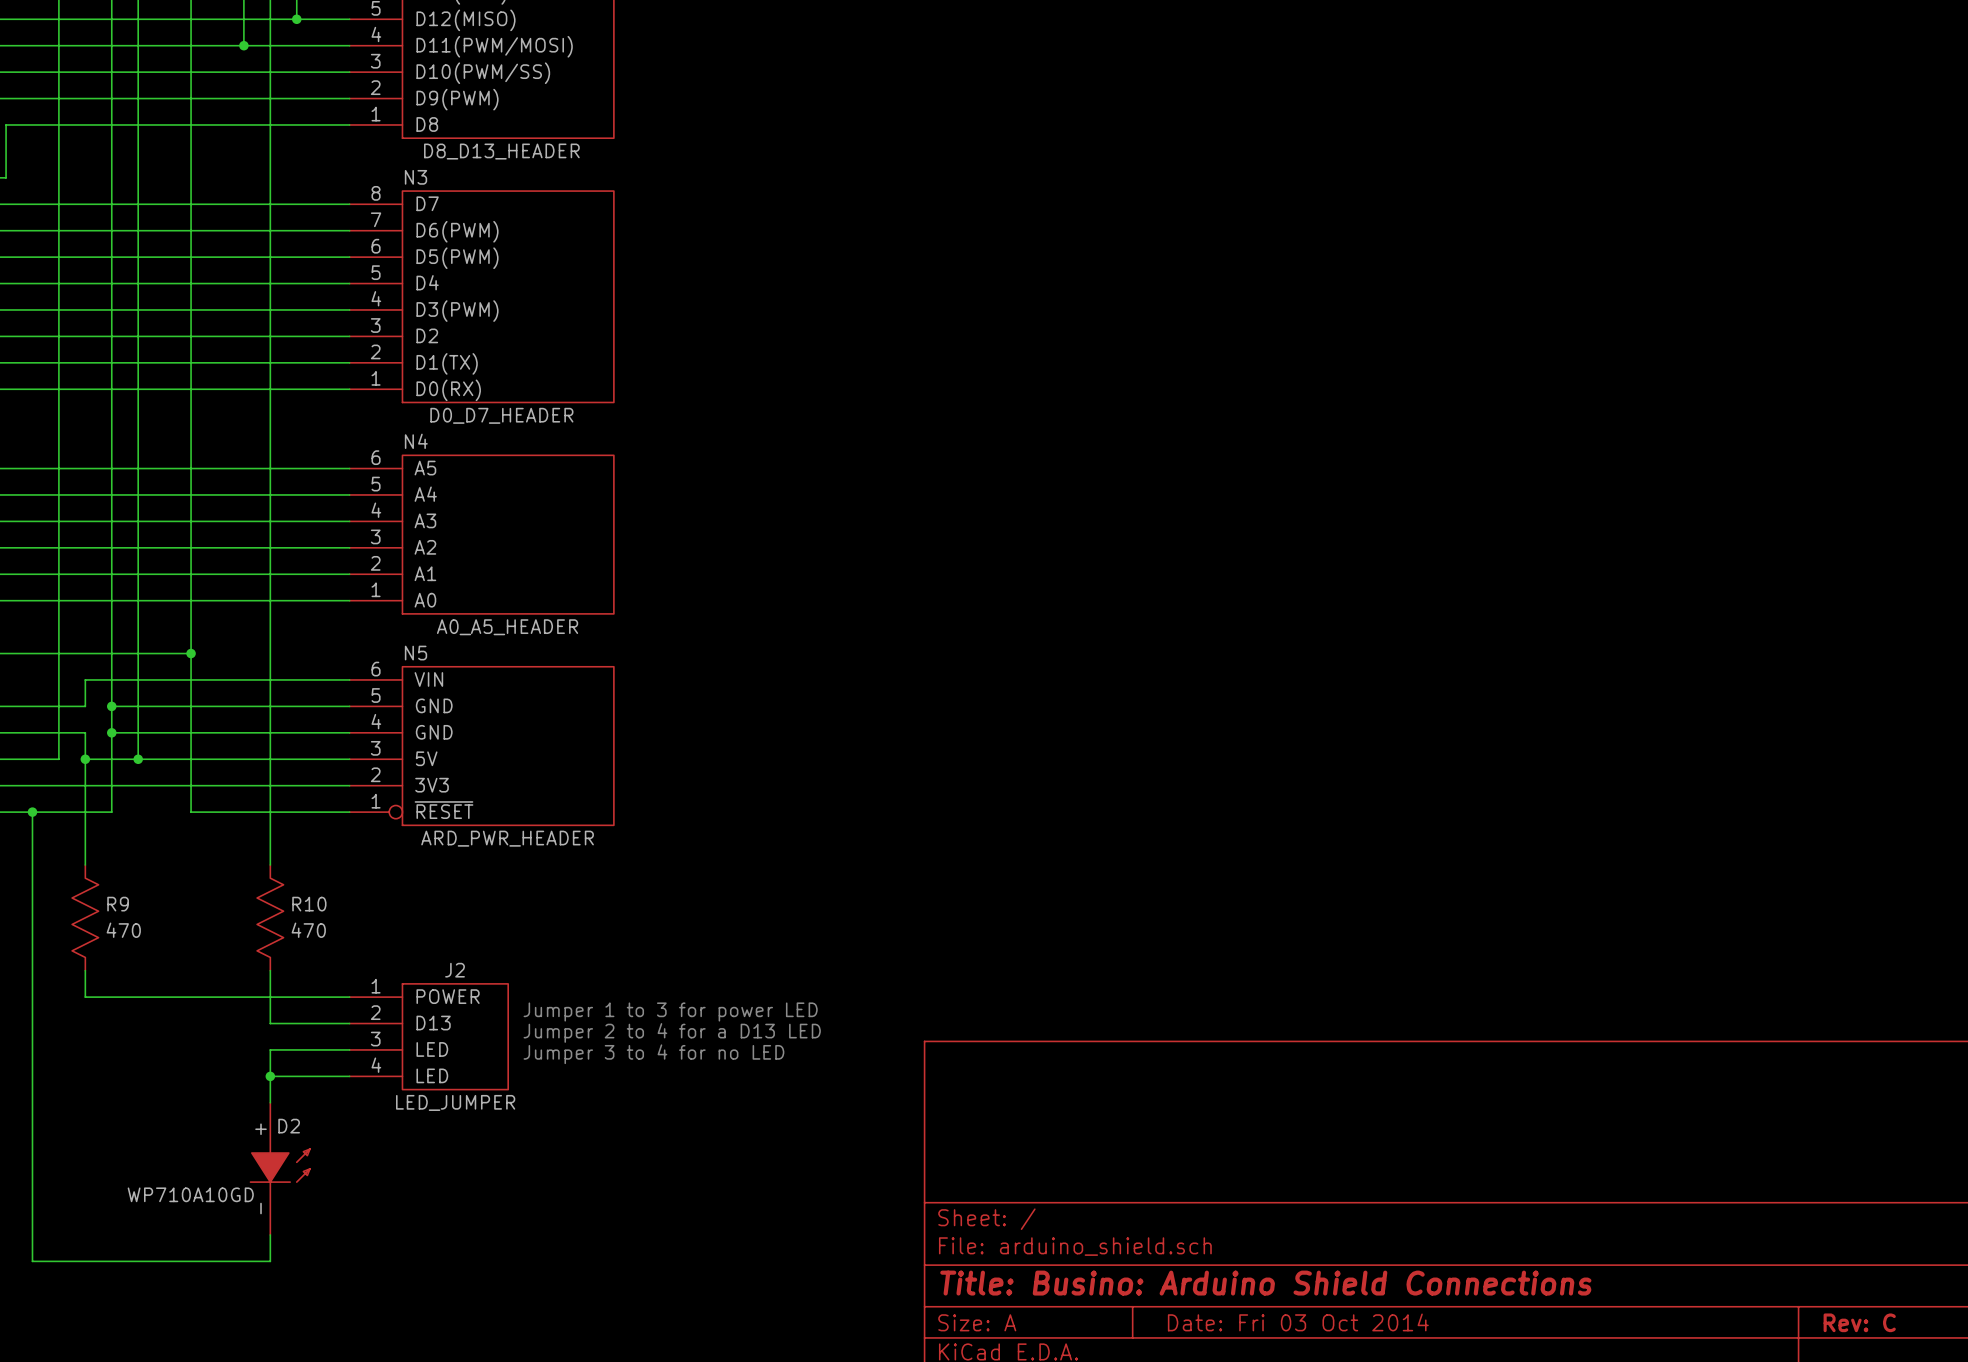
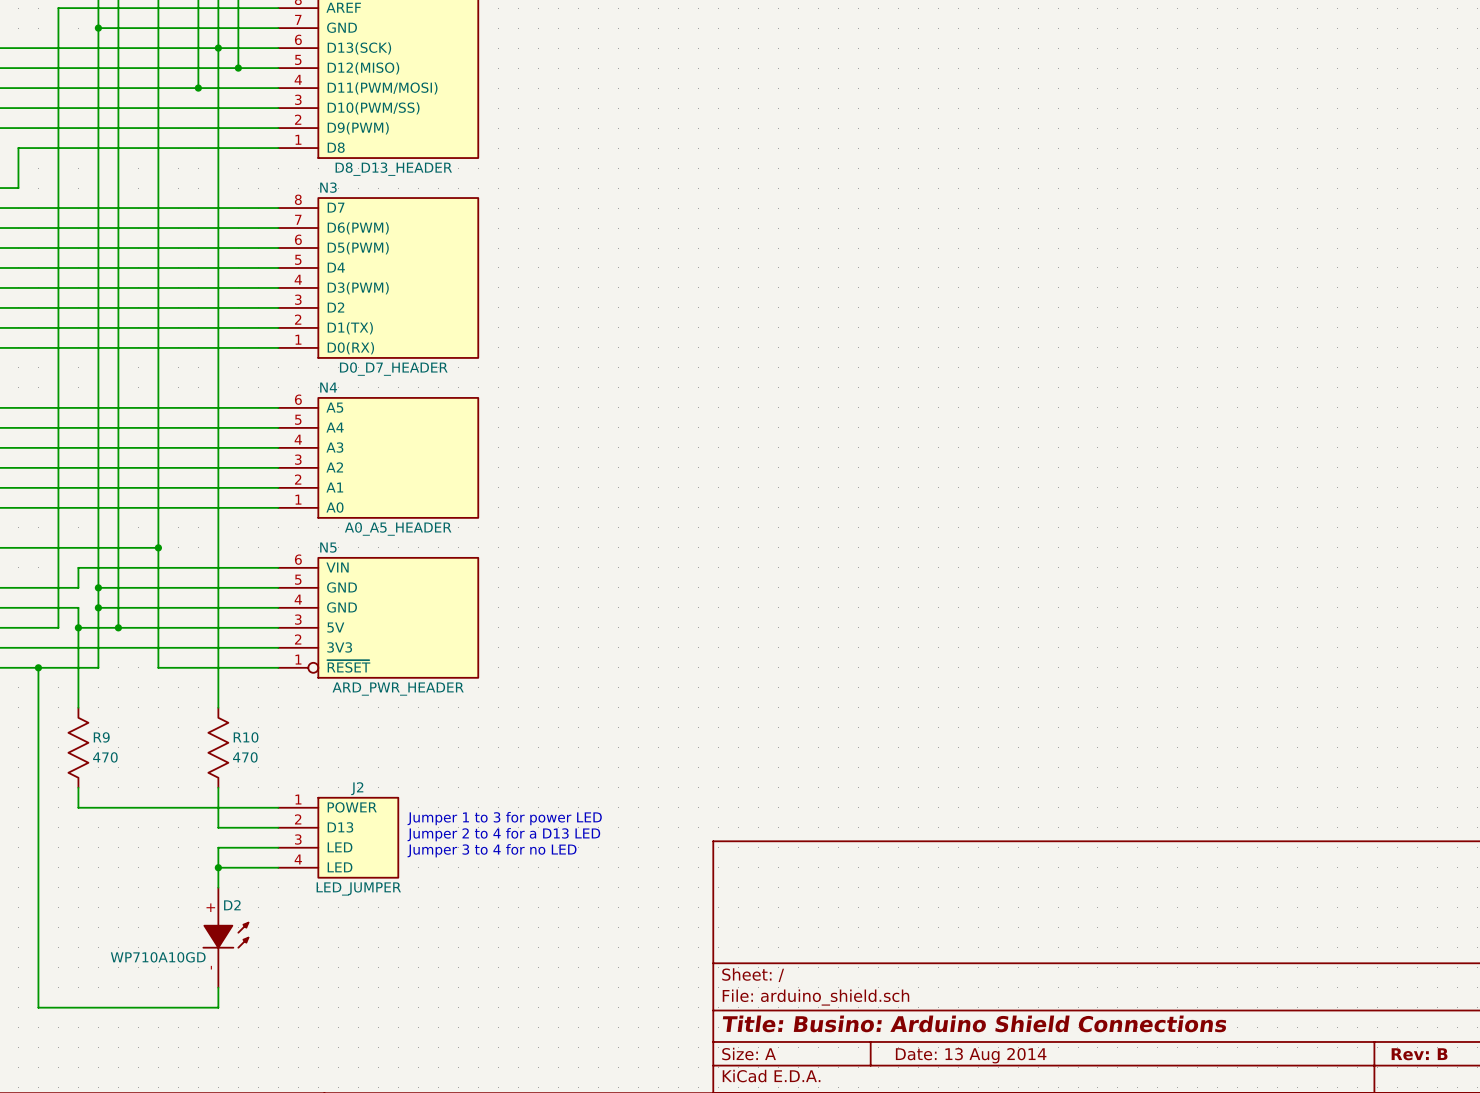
title block: Date: Fri 03 Oct 2014 (1298, 1322) -> Date: 13 Aug 2014 (971, 1055)
title block: Rev: C (1859, 1322) -> Rev: B (1419, 1054)

